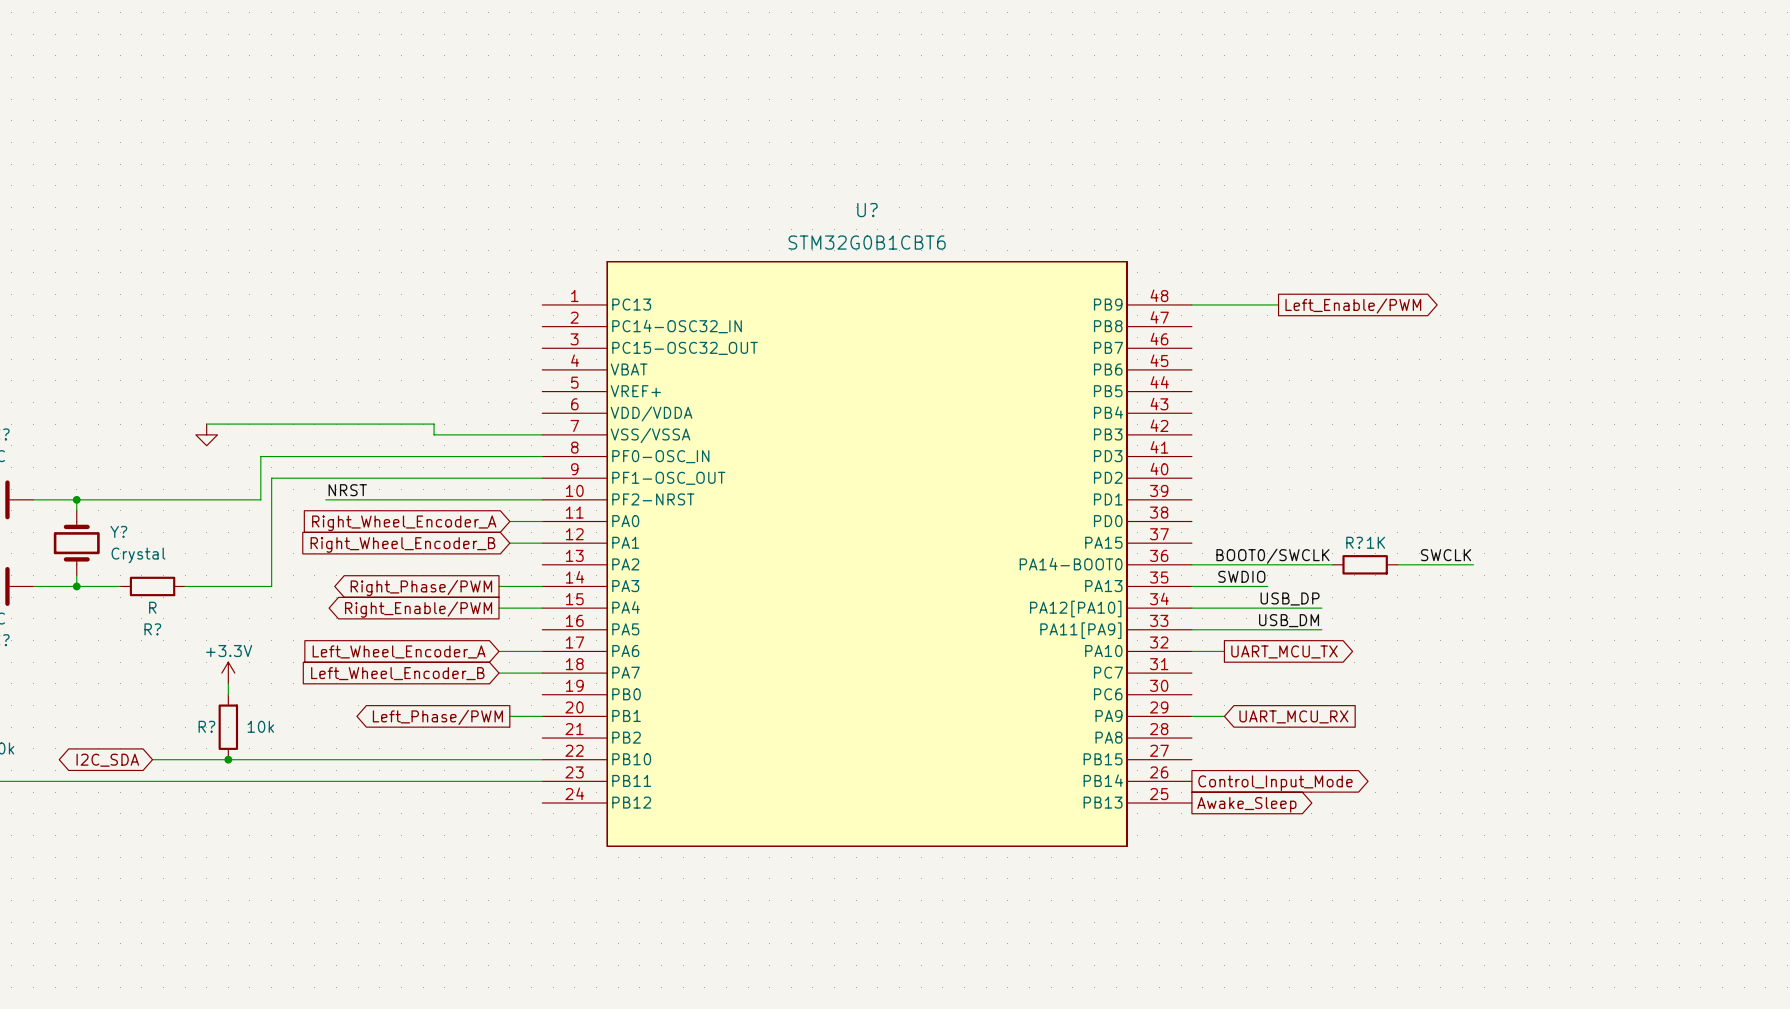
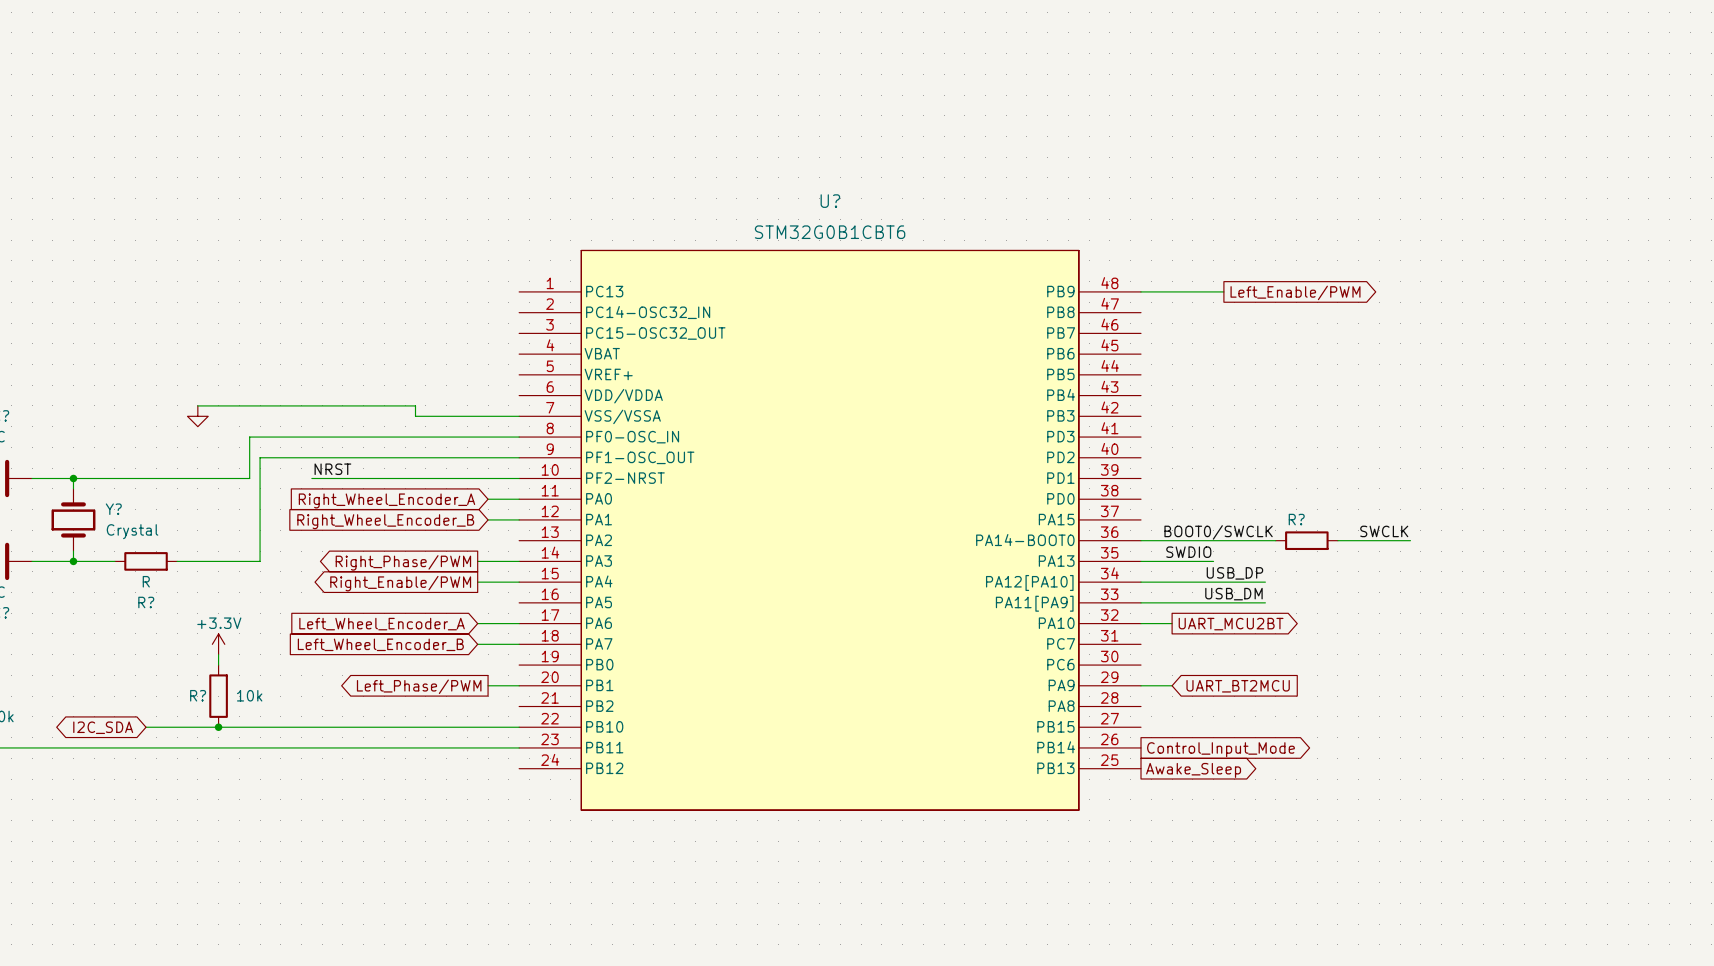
R? value: 1K (1375, 542) -> none
global label: UART_MCU_TX (1284, 651) -> UART_MCU2BT (1231, 624)
global label: UART_MCU_RX (1293, 716) -> UART_BT2MCU (1238, 686)

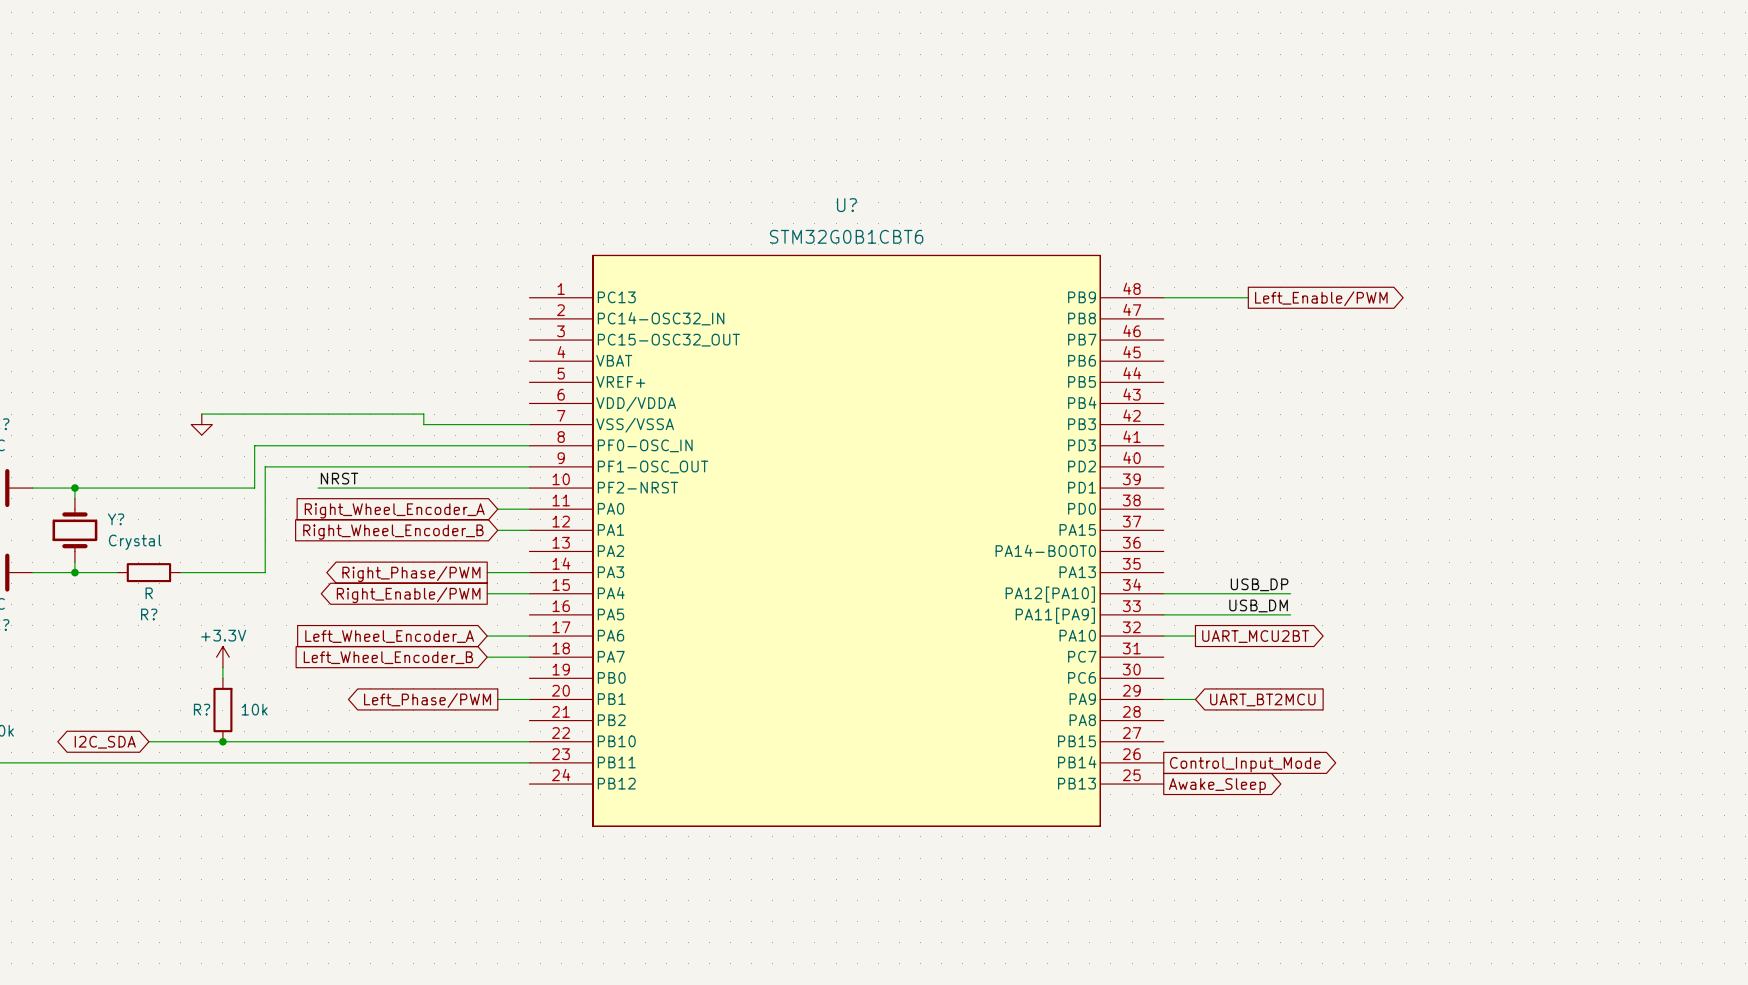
label: SWCLK (1384, 531) -> none
label: BOOT0/SWCLK (1218, 532) -> none
wire: (1141, 540) (1275, 540) -> none
R?: (1306, 540) -> none
wire: (1337, 540) (1410, 540) -> none
label: SWDIO (1188, 552) -> none
wire: (1141, 561) (1213, 561) -> none

